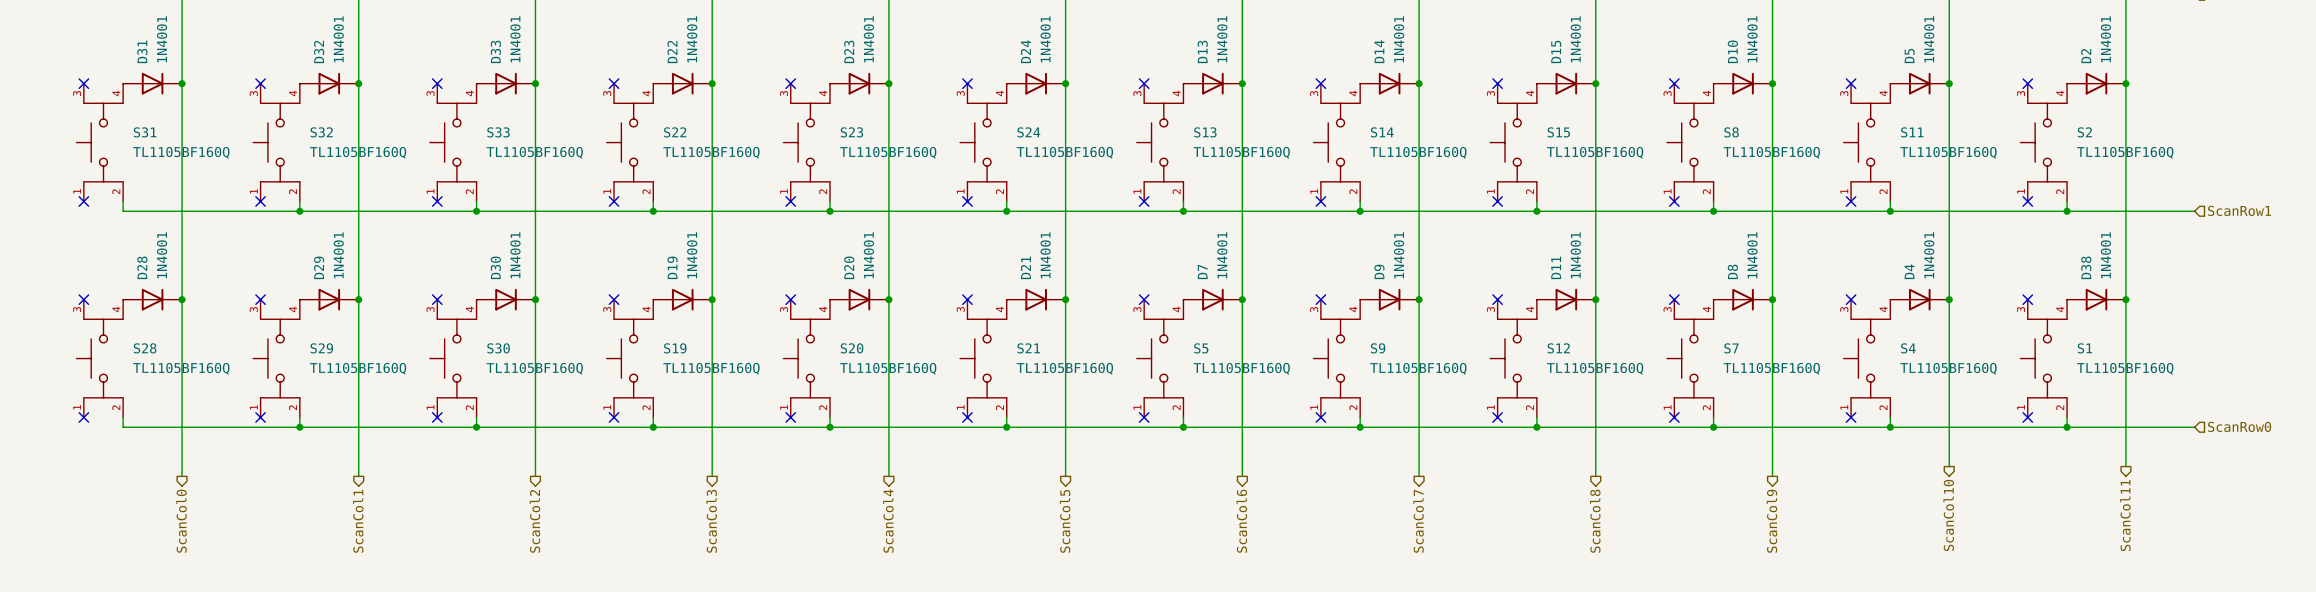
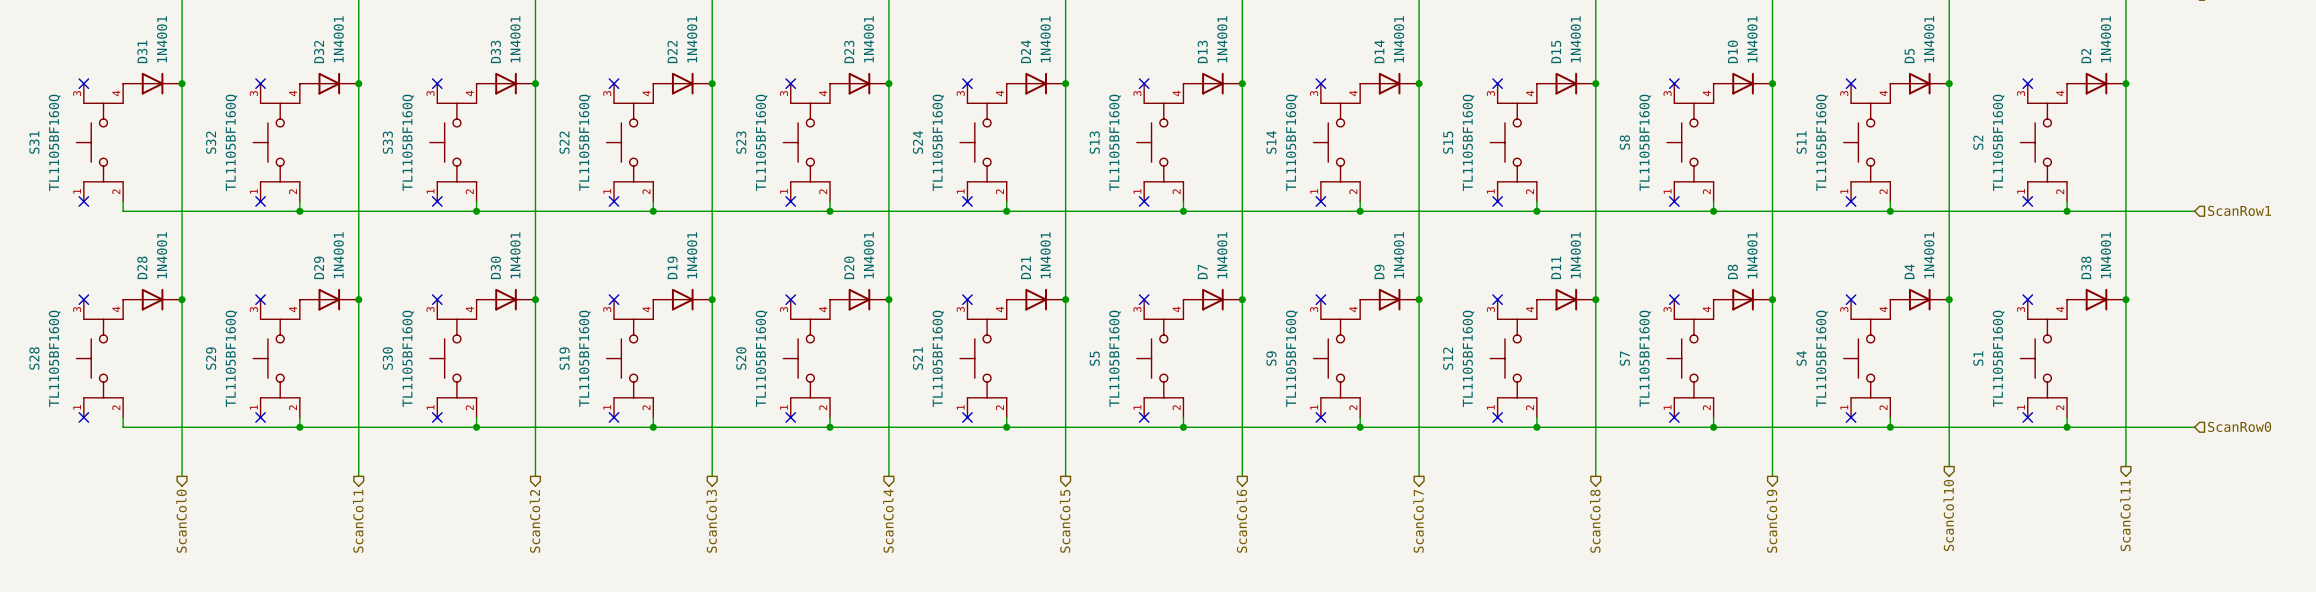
S31 name rotation: 0° (145, 132) -> 90° counterclockwise (34, 142)
S31 name position: S31 (145, 132) -> S31 (34, 142)
S32 name rotation: 0° (321, 132) -> 90° counterclockwise (211, 142)
S32 name position: S32 (321, 132) -> S32 (211, 142)
S33 name rotation: 0° (498, 132) -> 90° counterclockwise (387, 142)
S33 name position: S33 (498, 132) -> S33 (387, 142)
S22 name rotation: 0° (675, 132) -> 90° counterclockwise (564, 142)
S22 name position: S22 (675, 132) -> S22 (564, 142)
S23 name rotation: 0° (851, 132) -> 90° counterclockwise (741, 142)
S23 name position: S23 (851, 132) -> S23 (741, 142)
S24 name rotation: 0° (1028, 132) -> 90° counterclockwise (918, 142)
S24 name position: S24 (1028, 132) -> S24 (918, 142)
S13 name rotation: 0° (1205, 132) -> 90° counterclockwise (1094, 142)
S13 name position: S13 (1205, 132) -> S13 (1094, 142)
S14 name rotation: 0° (1382, 132) -> 90° counterclockwise (1271, 142)
S14 name position: S14 (1382, 132) -> S14 (1271, 142)
S15 name rotation: 0° (1558, 132) -> 90° counterclockwise (1448, 142)
S15 name position: S15 (1558, 132) -> S15 (1448, 142)
S8 name rotation: 0° (1731, 132) -> 90° counterclockwise (1624, 142)
S8 name position: S8 (1731, 132) -> S8 (1624, 142)
S11 name rotation: 0° (1912, 132) -> 90° counterclockwise (1801, 142)
S11 name position: S11 (1912, 132) -> S11 (1801, 142)
S2 name rotation: 0° (2084, 132) -> 90° counterclockwise (1978, 142)
S2 name position: S2 (2084, 132) -> S2 (1978, 142)
S31 value rotation: 0° (181, 152) -> 90° counterclockwise (54, 142)
S31 value position: TL1105BF160Q (181, 152) -> TL1105BF160Q (54, 142)
S32 value rotation: 0° (358, 152) -> 90° counterclockwise (231, 142)
S32 value position: TL1105BF160Q (358, 152) -> TL1105BF160Q (231, 142)
S33 value rotation: 0° (534, 152) -> 90° counterclockwise (408, 142)
S33 value position: TL1105BF160Q (534, 152) -> TL1105BF160Q (408, 142)
S22 value rotation: 0° (711, 152) -> 90° counterclockwise (584, 142)
S22 value position: TL1105BF160Q (711, 152) -> TL1105BF160Q (584, 142)
S23 value rotation: 0° (888, 152) -> 90° counterclockwise (761, 142)
S23 value position: TL1105BF160Q (888, 152) -> TL1105BF160Q (761, 142)
S24 value rotation: 0° (1064, 152) -> 90° counterclockwise (938, 142)
S24 value position: TL1105BF160Q (1064, 152) -> TL1105BF160Q (938, 142)
S13 value rotation: 0° (1241, 152) -> 90° counterclockwise (1115, 142)
S13 value position: TL1105BF160Q (1241, 152) -> TL1105BF160Q (1115, 142)
S14 value rotation: 0° (1418, 152) -> 90° counterclockwise (1291, 142)
S14 value position: TL1105BF160Q (1418, 152) -> TL1105BF160Q (1291, 142)
S15 value rotation: 0° (1595, 152) -> 90° counterclockwise (1468, 142)
S15 value position: TL1105BF160Q (1595, 152) -> TL1105BF160Q (1468, 142)
S8 value rotation: 0° (1771, 152) -> 90° counterclockwise (1645, 142)
S8 value position: TL1105BF160Q (1771, 152) -> TL1105BF160Q (1645, 142)
S11 value rotation: 0° (1948, 152) -> 90° counterclockwise (1822, 142)
S11 value position: TL1105BF160Q (1948, 152) -> TL1105BF160Q (1822, 142)
S2 value rotation: 0° (2125, 152) -> 90° counterclockwise (1998, 142)
S2 value position: TL1105BF160Q (2125, 152) -> TL1105BF160Q (1998, 142)
S28 name rotation: 0° (145, 348) -> 90° counterclockwise (34, 358)
S28 name position: S28 (145, 348) -> S28 (34, 358)
S29 name rotation: 0° (321, 348) -> 90° counterclockwise (211, 358)
S29 name position: S29 (321, 348) -> S29 (211, 358)
S30 name rotation: 0° (498, 348) -> 90° counterclockwise (387, 358)
S30 name position: S30 (498, 348) -> S30 (387, 358)
S19 name rotation: 0° (675, 348) -> 90° counterclockwise (564, 358)
S19 name position: S19 (675, 348) -> S19 (564, 358)
S20 name rotation: 0° (852, 348) -> 90° counterclockwise (741, 358)
S20 name position: S20 (852, 348) -> S20 (741, 358)
S21 name rotation: 0° (1028, 348) -> 90° counterclockwise (918, 358)
S21 name position: S21 (1028, 348) -> S21 (918, 358)
S5 name rotation: 0° (1201, 348) -> 90° counterclockwise (1094, 358)
S5 name position: S5 (1201, 348) -> S5 (1094, 358)
S9 name rotation: 0° (1378, 348) -> 90° counterclockwise (1271, 358)
S9 name position: S9 (1378, 348) -> S9 (1271, 358)
S12 name rotation: 0° (1558, 348) -> 90° counterclockwise (1448, 358)
S12 name position: S12 (1558, 348) -> S12 (1448, 358)
S7 name rotation: 0° (1731, 348) -> 90° counterclockwise (1624, 358)
S7 name position: S7 (1731, 348) -> S7 (1624, 358)
S4 name rotation: 0° (1908, 348) -> 90° counterclockwise (1801, 358)
S4 name position: S4 (1908, 348) -> S4 (1801, 358)
S1 name rotation: 0° (2084, 348) -> 90° counterclockwise (1978, 358)
S1 name position: S1 (2084, 348) -> S1 (1978, 358)
S28 value rotation: 0° (181, 368) -> 90° counterclockwise (54, 358)
S28 value position: TL1105BF160Q (181, 368) -> TL1105BF160Q (54, 358)
S29 value rotation: 0° (358, 368) -> 90° counterclockwise (231, 358)
S29 value position: TL1105BF160Q (358, 368) -> TL1105BF160Q (231, 358)
S30 value rotation: 0° (534, 368) -> 90° counterclockwise (408, 358)
S30 value position: TL1105BF160Q (534, 368) -> TL1105BF160Q (408, 358)
S19 value rotation: 0° (711, 368) -> 90° counterclockwise (584, 358)
S19 value position: TL1105BF160Q (711, 368) -> TL1105BF160Q (584, 358)
S20 value rotation: 0° (888, 368) -> 90° counterclockwise (761, 358)
S20 value position: TL1105BF160Q (888, 368) -> TL1105BF160Q (761, 358)
S21 value rotation: 0° (1064, 368) -> 90° counterclockwise (938, 358)
S21 value position: TL1105BF160Q (1064, 368) -> TL1105BF160Q (938, 358)
S5 value rotation: 0° (1241, 368) -> 90° counterclockwise (1115, 358)
S5 value position: TL1105BF160Q (1241, 368) -> TL1105BF160Q (1115, 358)
S9 value rotation: 0° (1418, 368) -> 90° counterclockwise (1291, 358)
S9 value position: TL1105BF160Q (1418, 368) -> TL1105BF160Q (1291, 358)
S12 value rotation: 0° (1595, 368) -> 90° counterclockwise (1468, 358)
S12 value position: TL1105BF160Q (1595, 368) -> TL1105BF160Q (1468, 358)
S7 value rotation: 0° (1771, 368) -> 90° counterclockwise (1645, 358)
S7 value position: TL1105BF160Q (1771, 368) -> TL1105BF160Q (1645, 358)
S4 value rotation: 0° (1948, 368) -> 90° counterclockwise (1822, 358)
S4 value position: TL1105BF160Q (1948, 368) -> TL1105BF160Q (1822, 358)
S1 value rotation: 0° (2125, 368) -> 90° counterclockwise (1998, 358)
S1 value position: TL1105BF160Q (2125, 368) -> TL1105BF160Q (1998, 358)

